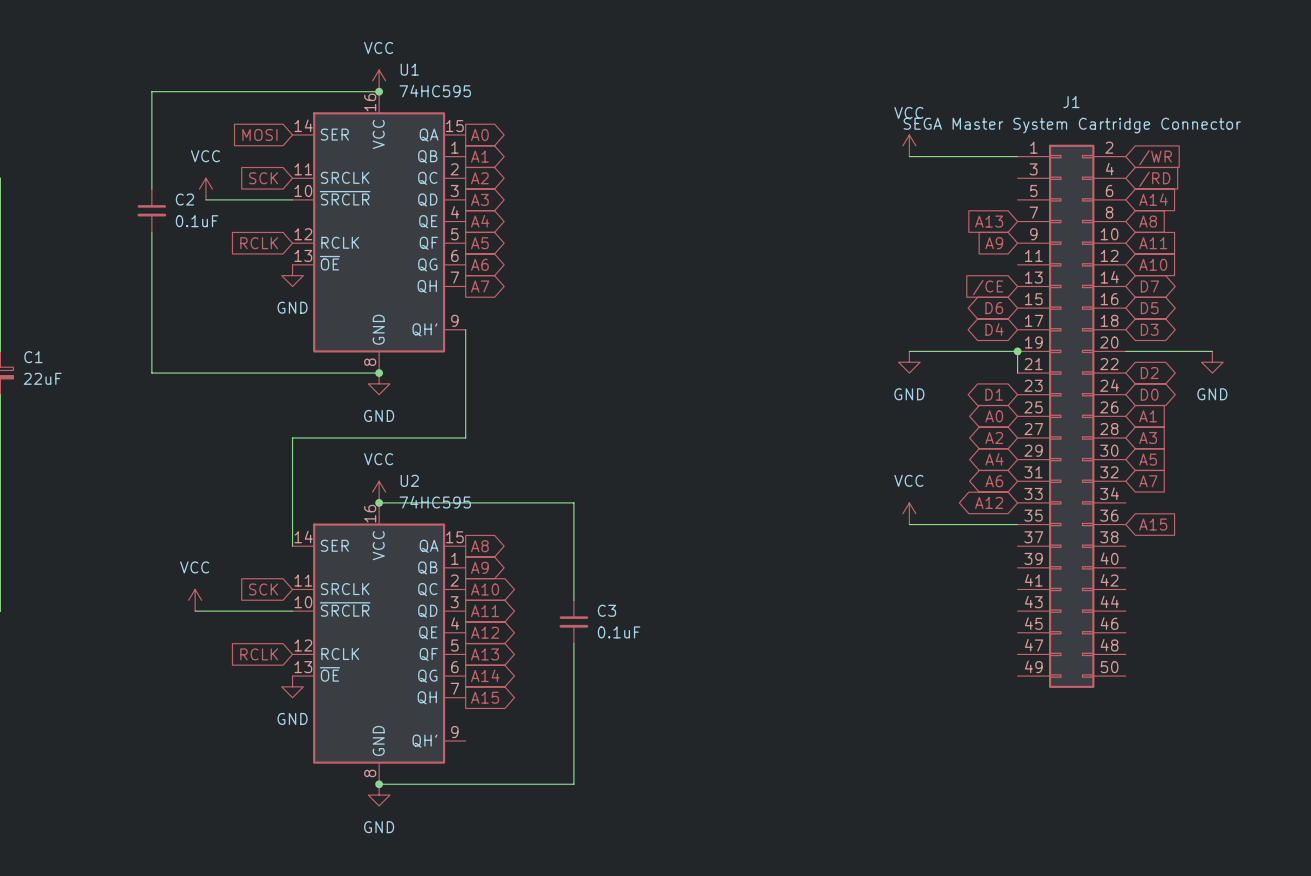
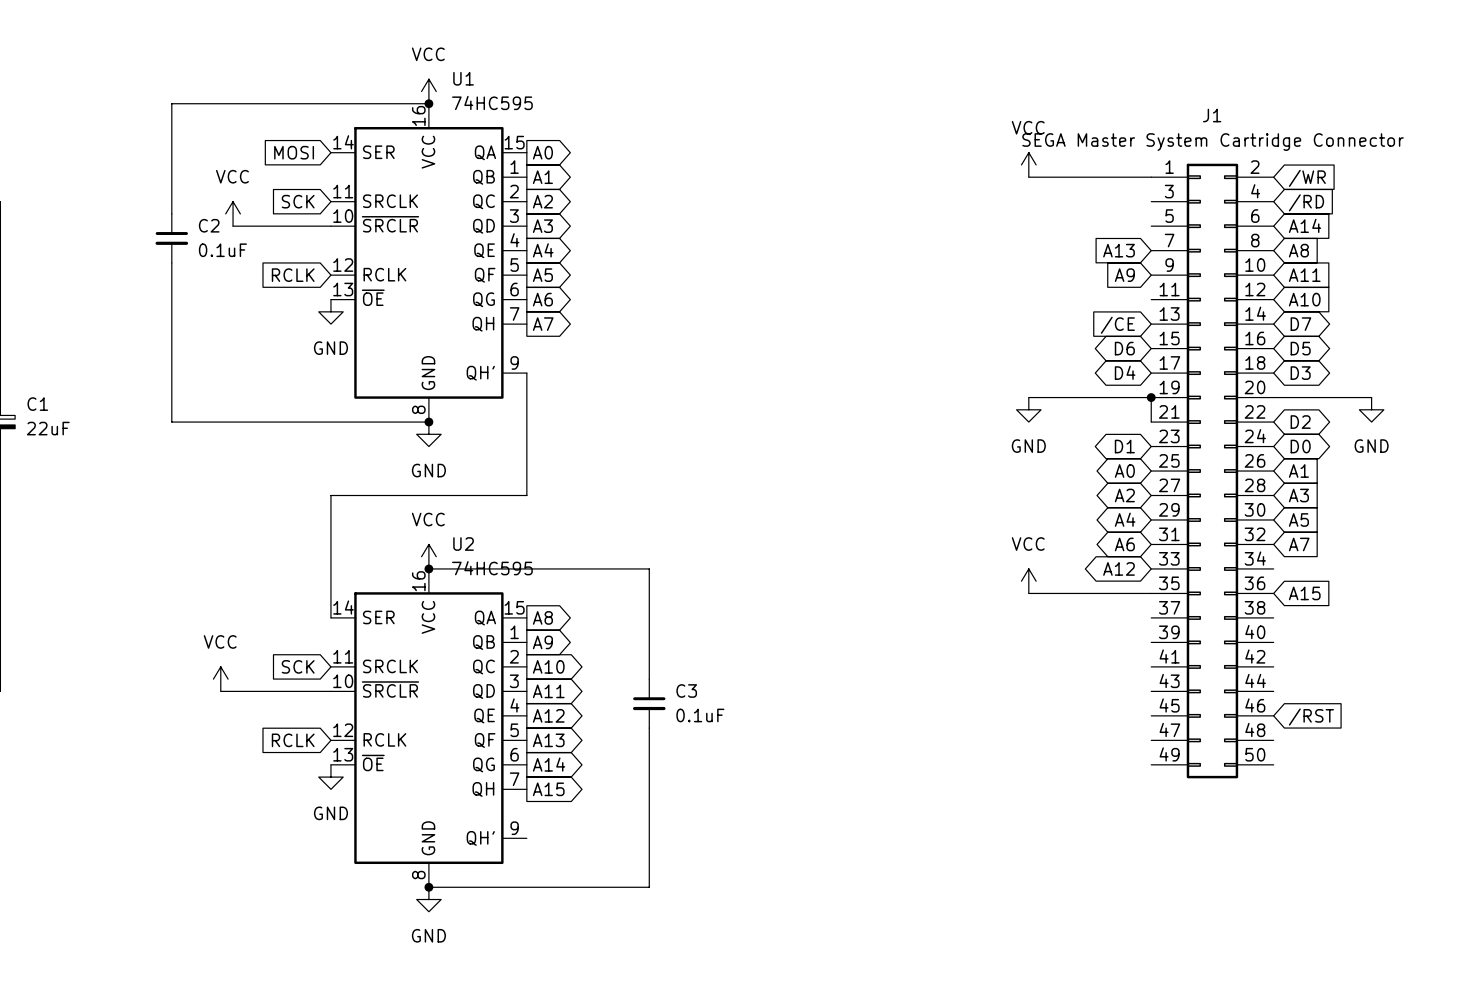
global label: none -> /RST (1311, 717)

